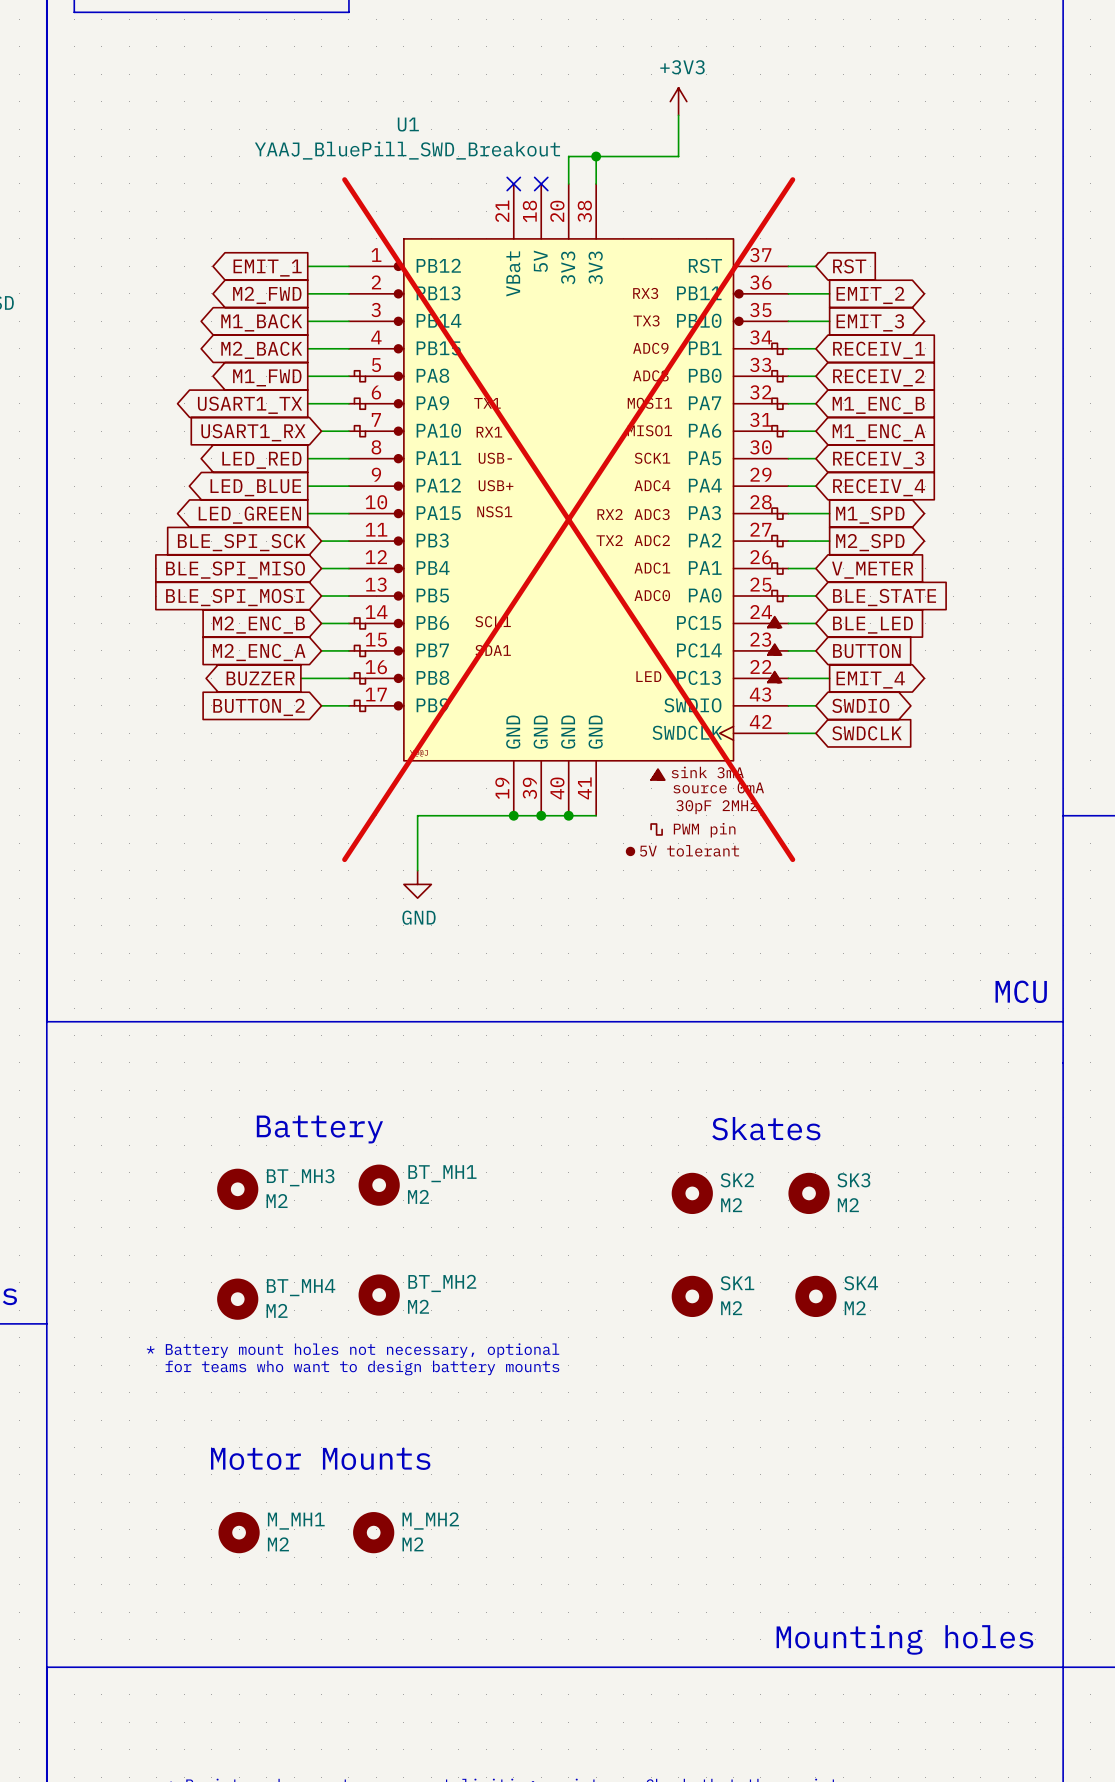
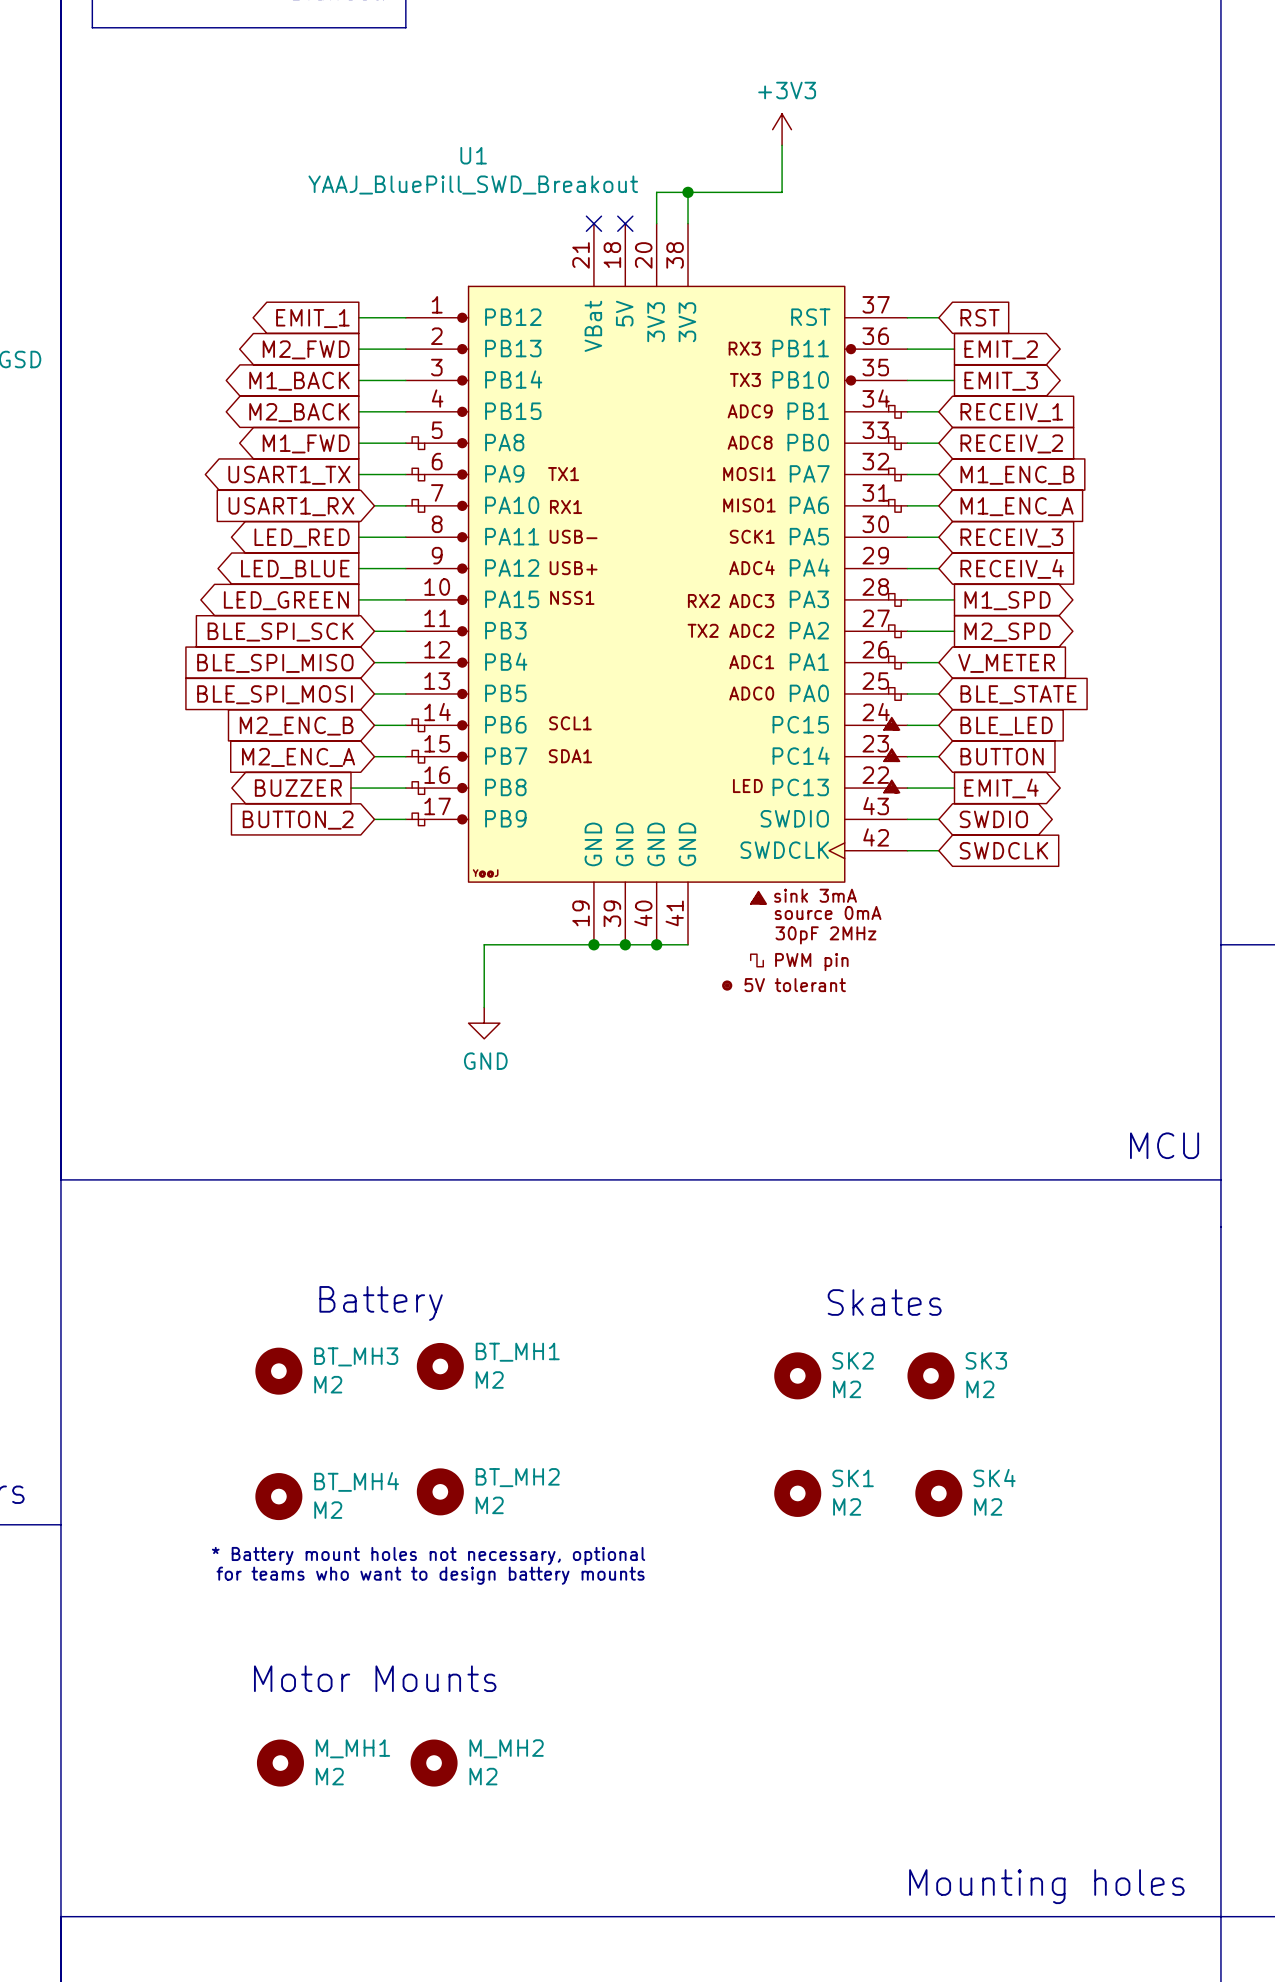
U1 do-not-place cross: (568, 519) -> none

